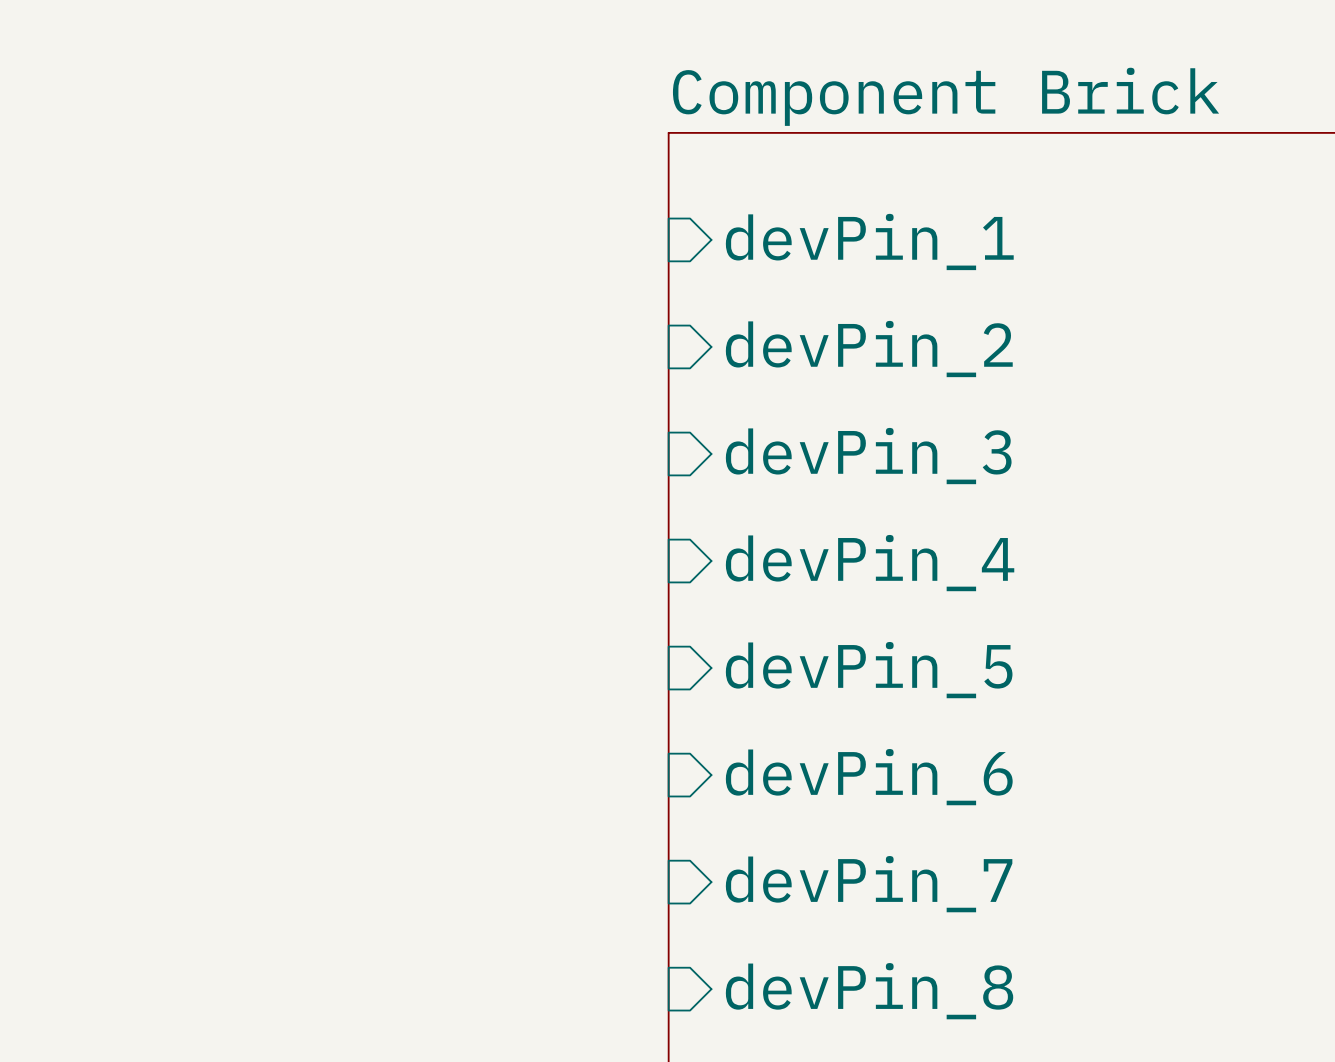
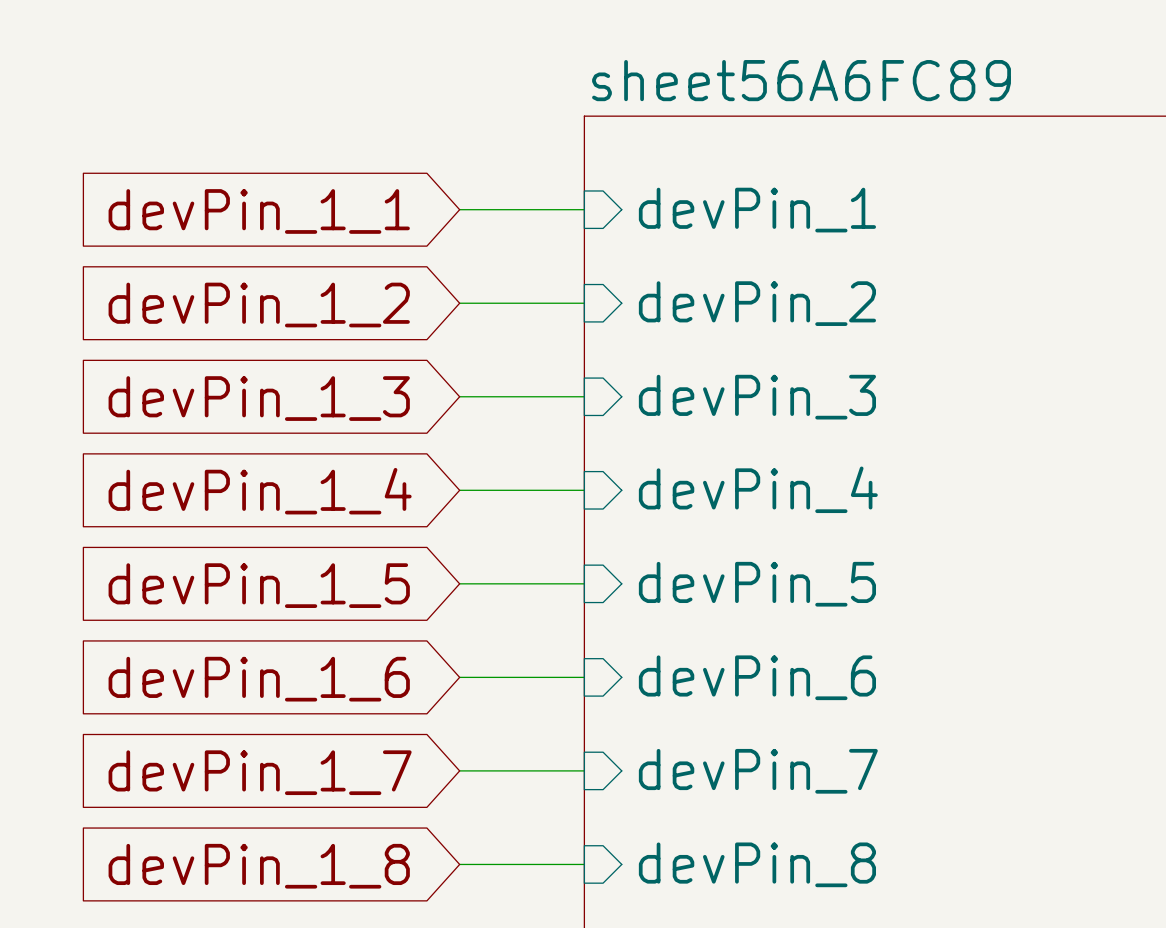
sheet Component Brick name: Component Brick (946, 96) -> sheet56A6FC89 (801, 80)
wire: none -> (459, 209) (584, 209)
global label: none -> devPin_1_1 (259, 211)
wire: none -> (459, 303) (584, 303)
global label: none -> devPin_1_2 (259, 305)
wire: none -> (459, 396) (584, 396)
global label: none -> devPin_1_3 (259, 398)
wire: none -> (459, 490) (584, 490)
global label: none -> devPin_1_4 (260, 491)
wire: none -> (459, 583) (584, 583)
global label: none -> devPin_1_5 (259, 585)
wire: none -> (459, 677) (584, 677)
global label: none -> devPin_1_6 (259, 679)
wire: none -> (459, 770) (584, 770)
global label: none -> devPin_1_7 (260, 772)
wire: none -> (459, 864) (584, 864)
global label: none -> devPin_1_8 (259, 866)

